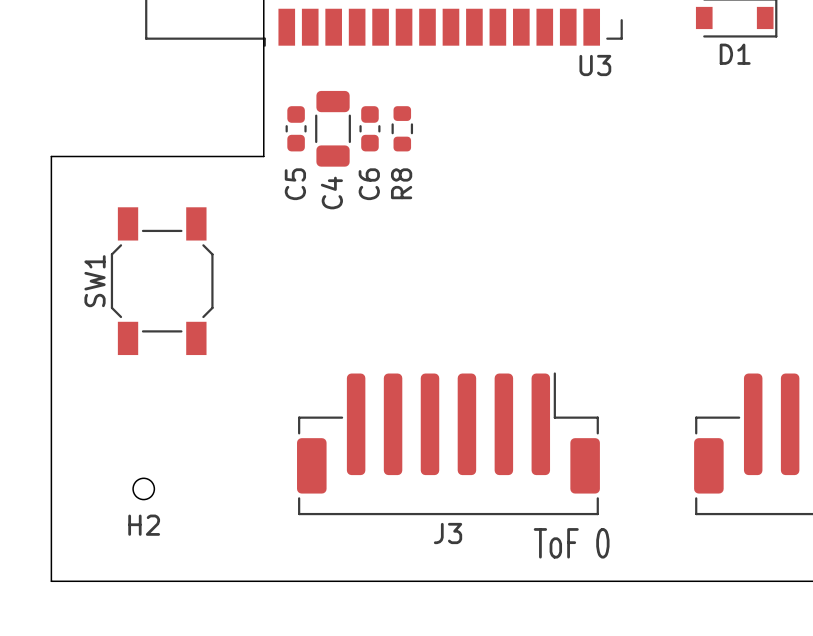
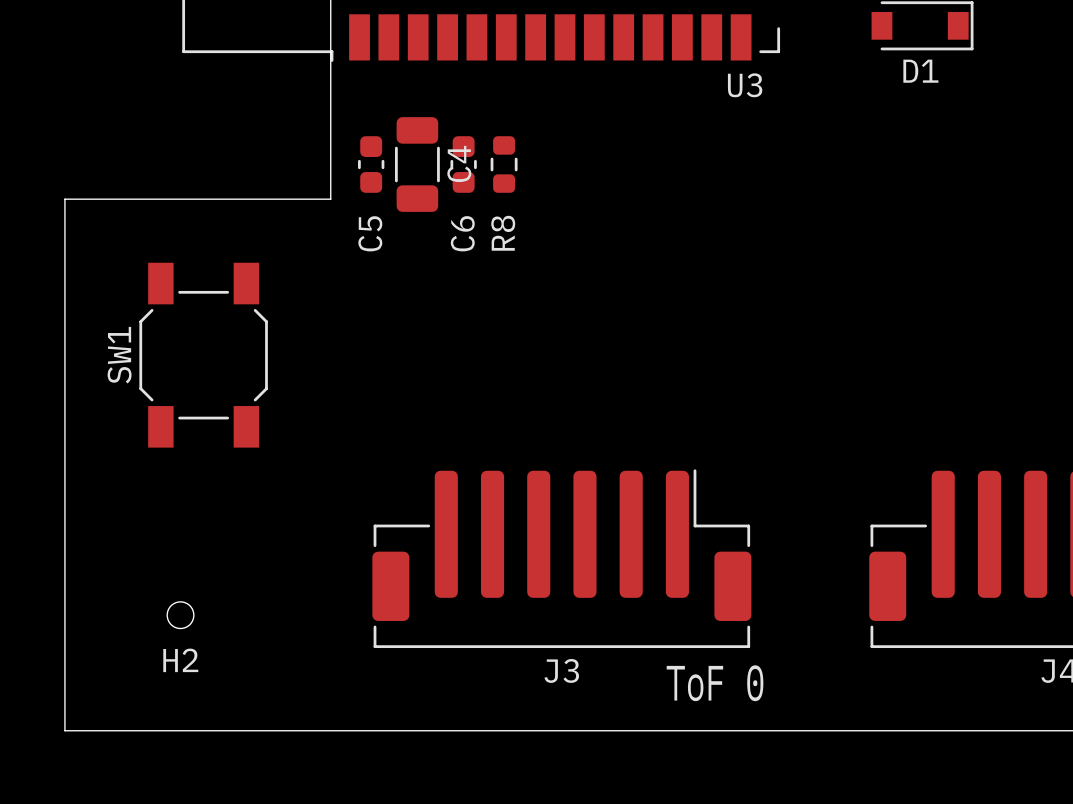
C4 name position: C4 (331, 192) -> C4 (459, 163)

